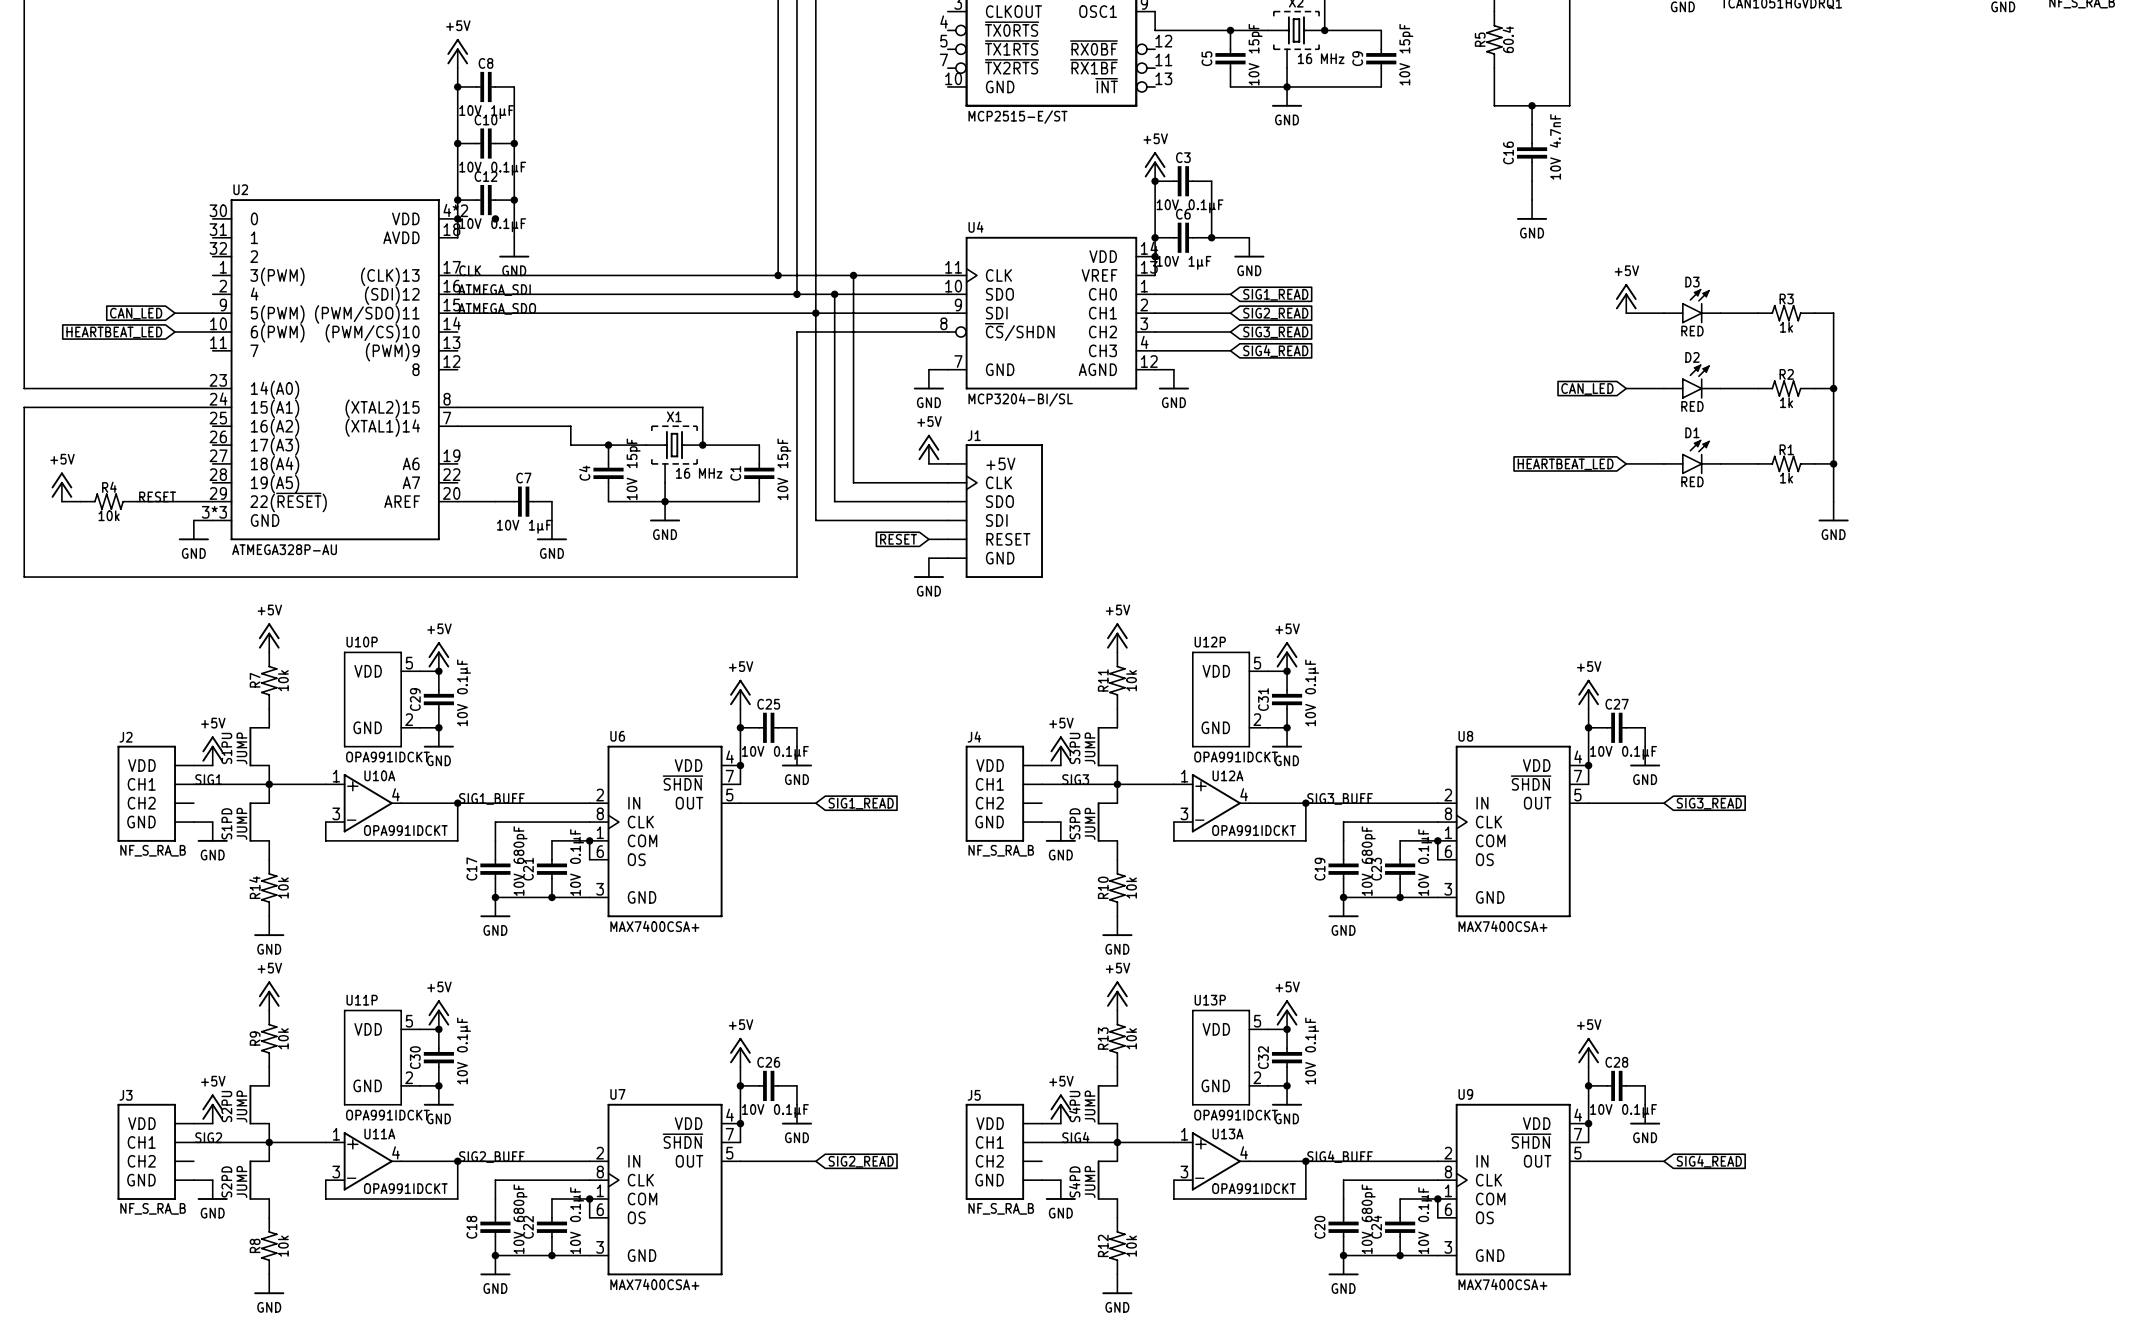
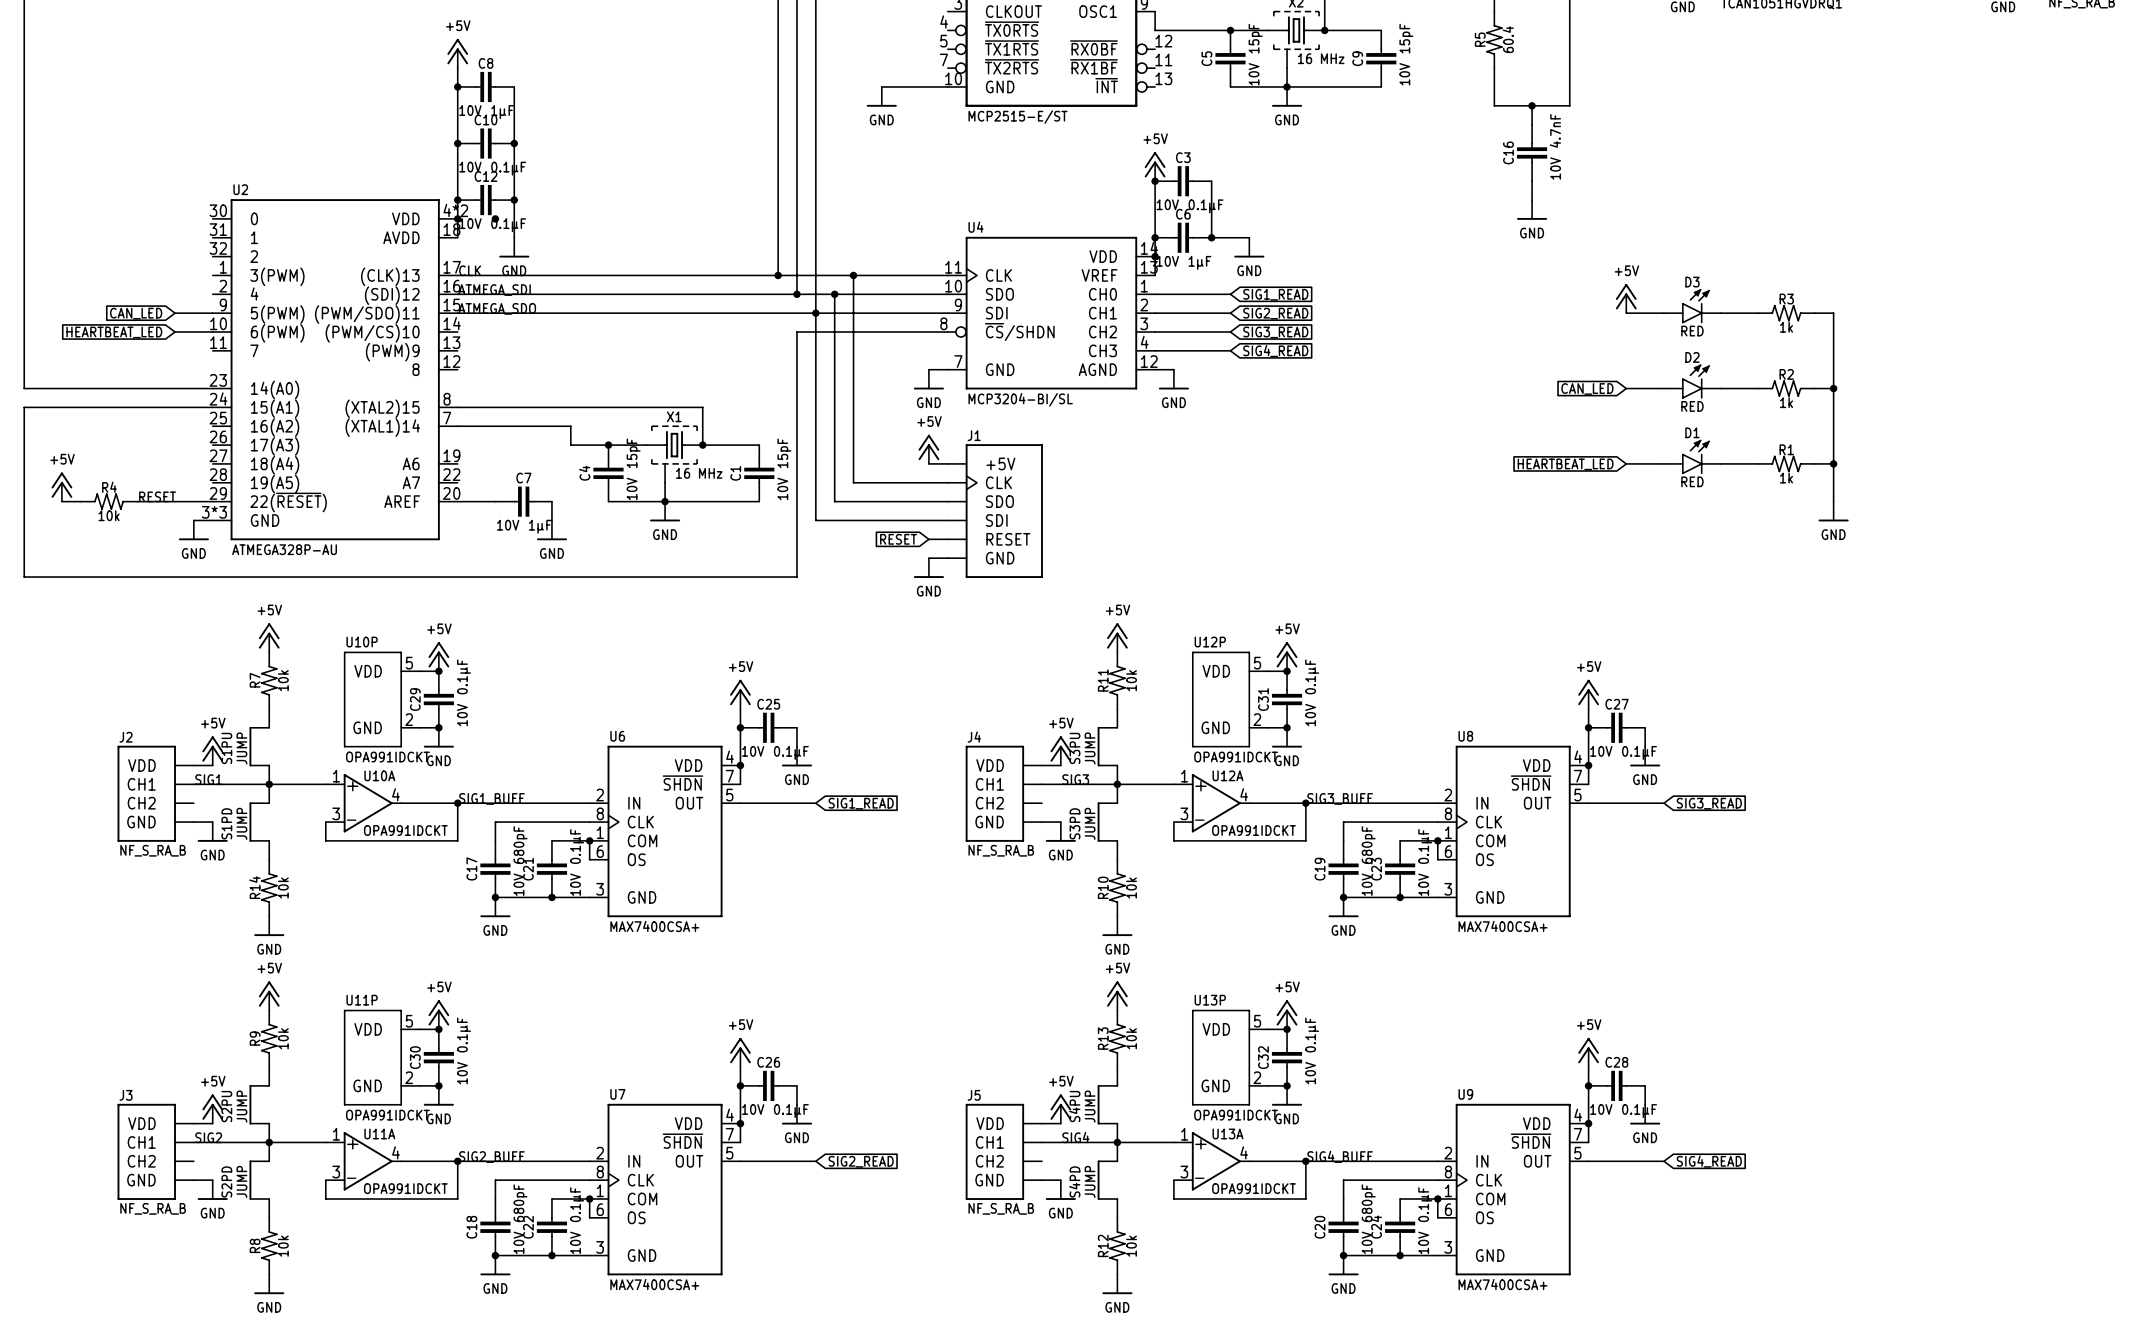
wire: none -> (881, 86) (947, 86)
power symbol: none -> GND (881, 96)

